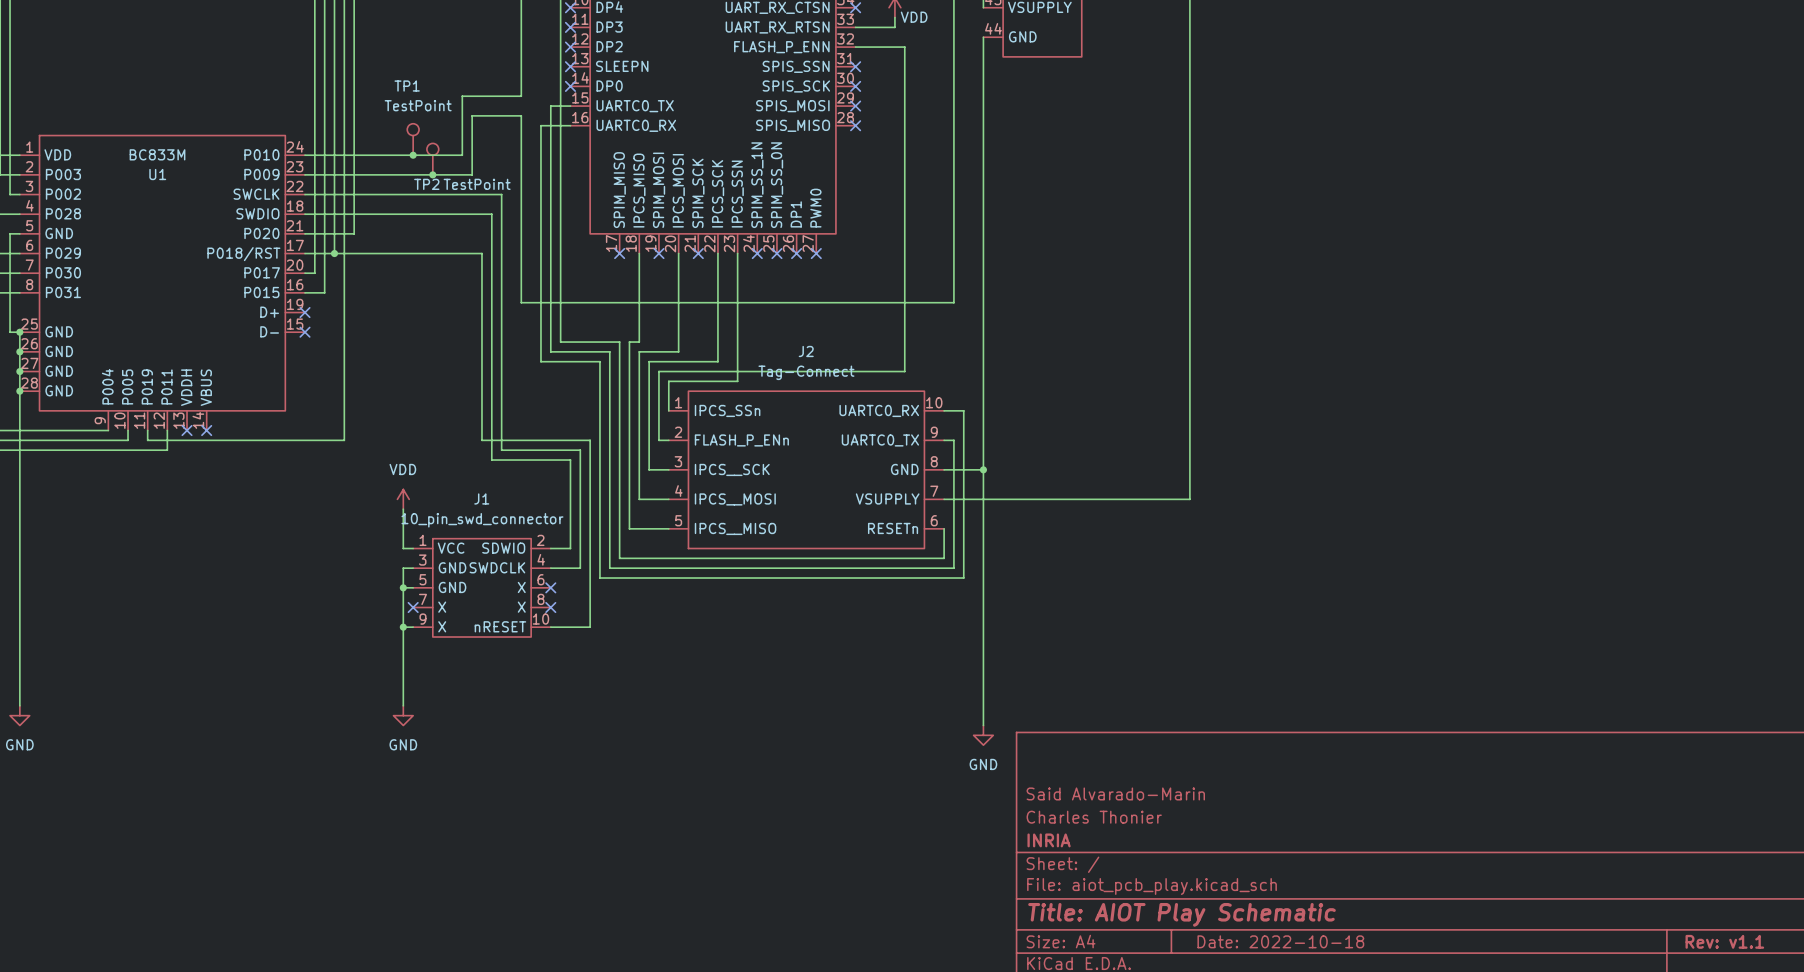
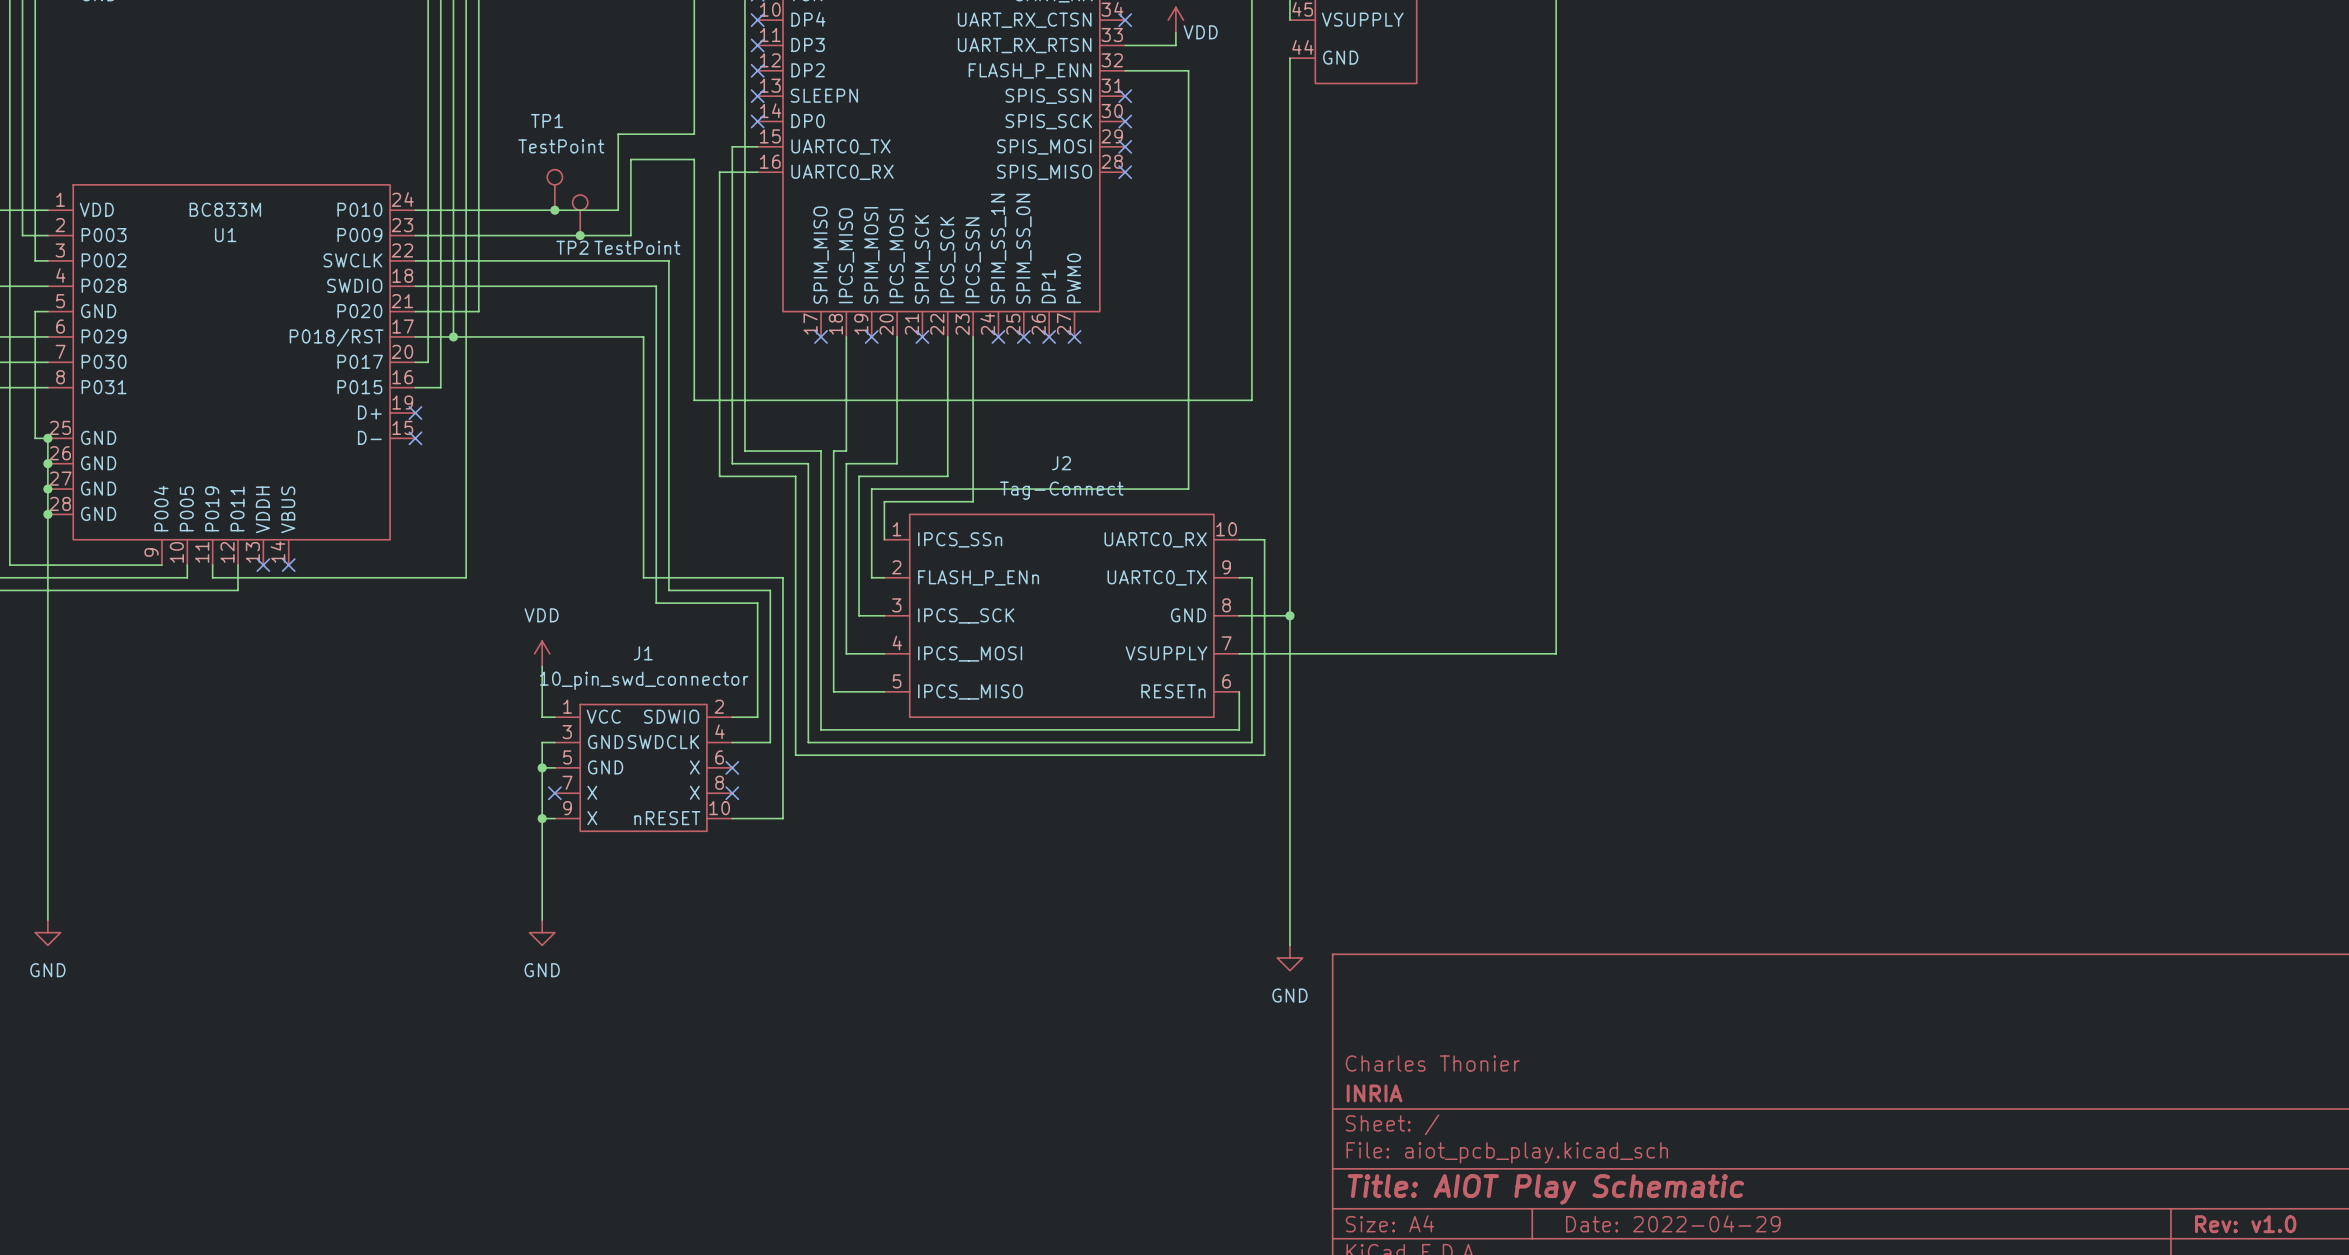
title block: Said Alvarado-Marin (1115, 793) -> none
title block: Date: 2022-10-18 (1280, 941) -> Date: 2022-04-29 (1673, 1223)
title block: Rev: v1.1 (1724, 941) -> Rev: v1.0 (2245, 1224)

